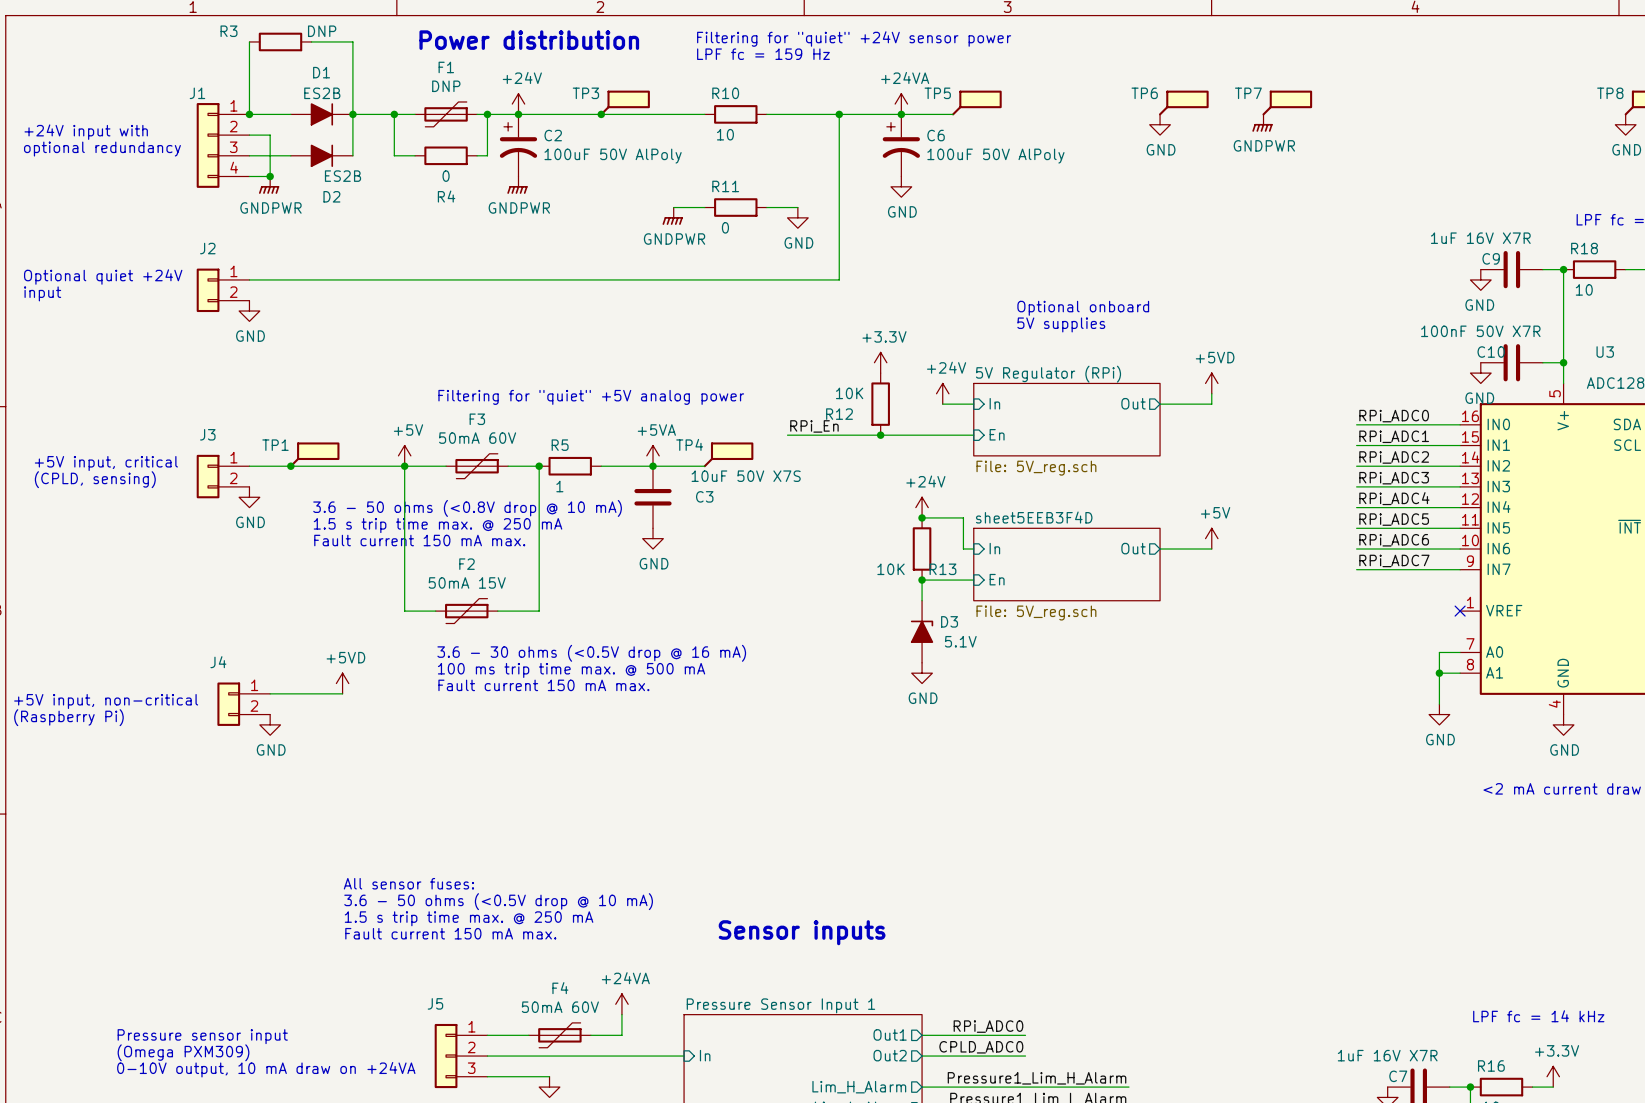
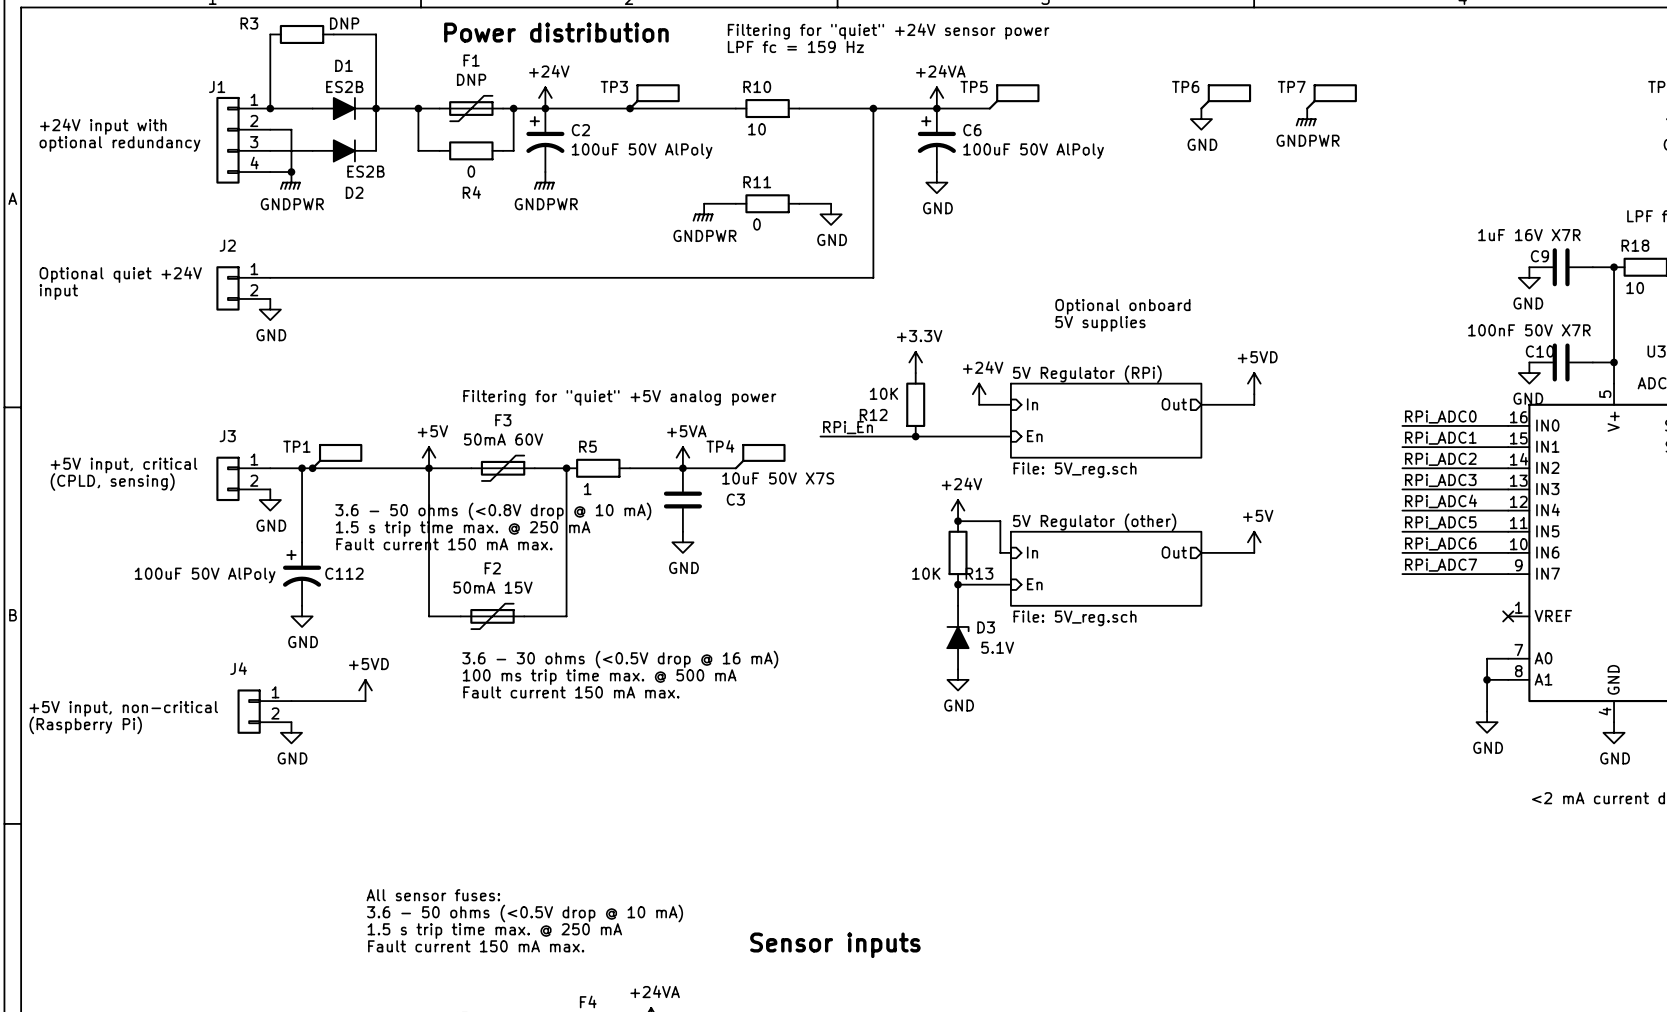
wire: none -> (302, 468) (302, 542)
junction: none -> (302, 468)
sheet sheet5EEB3F4D name: sheet5EEB3F4D (1034, 517) -> 5V Regulator (other) (1094, 522)
C112: none -> 100uF 50V AlPoly (302, 574)
power symbol: none -> GND (302, 616)

